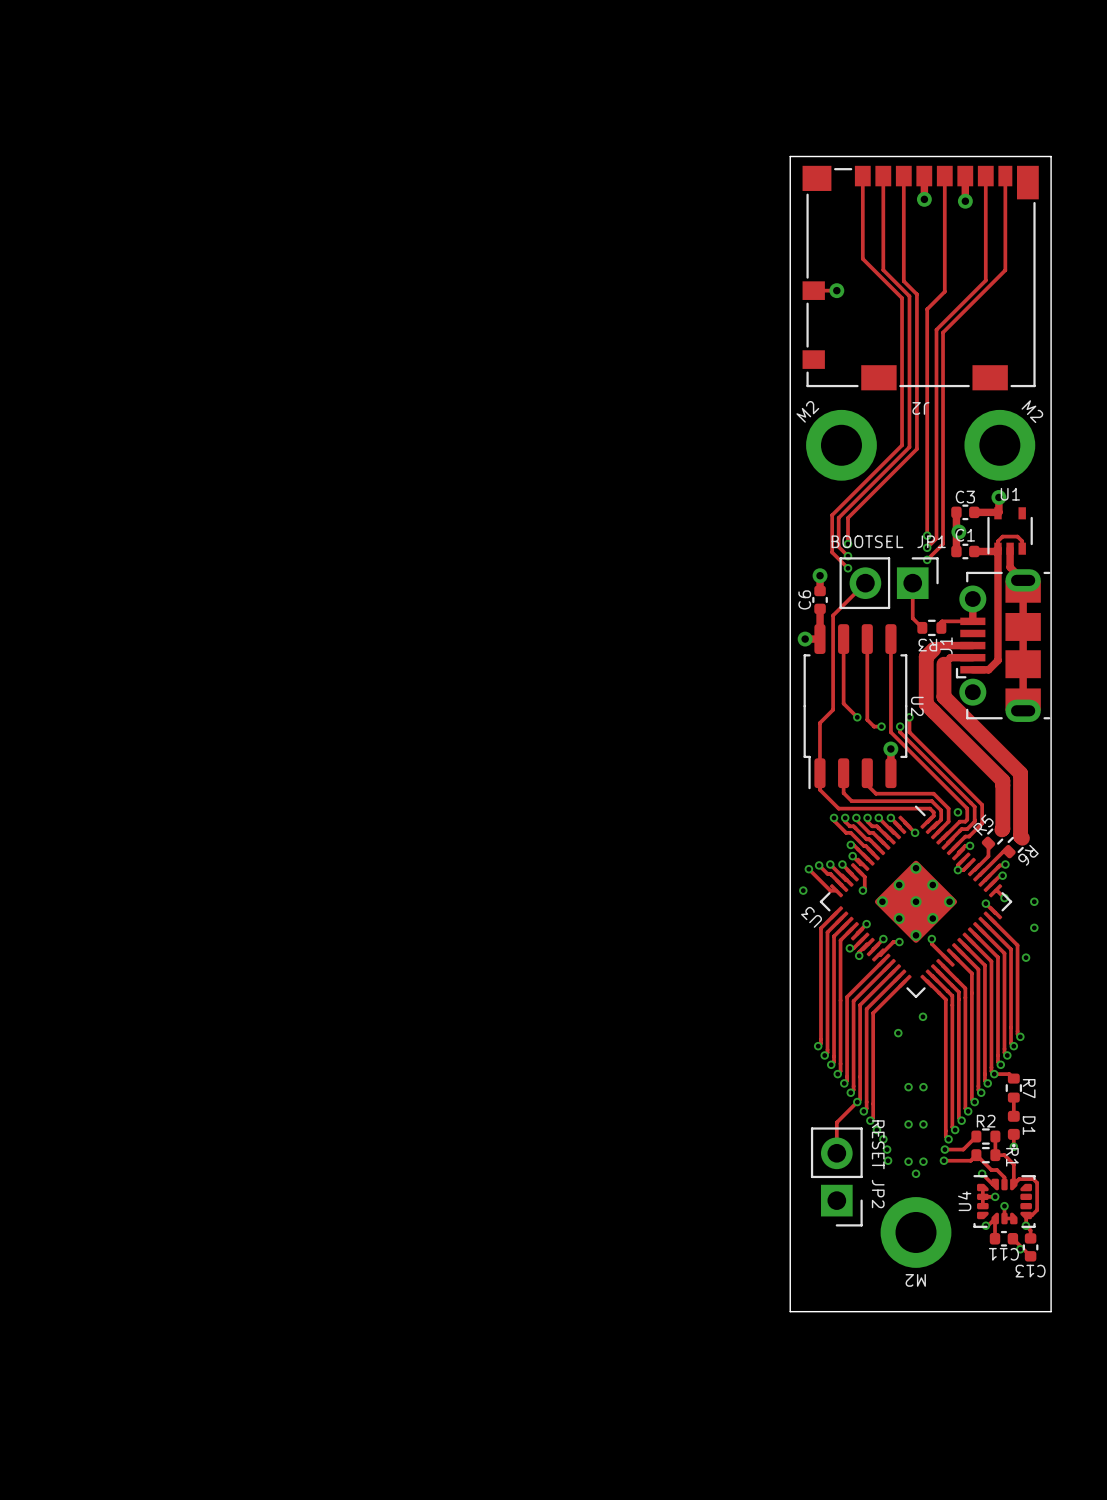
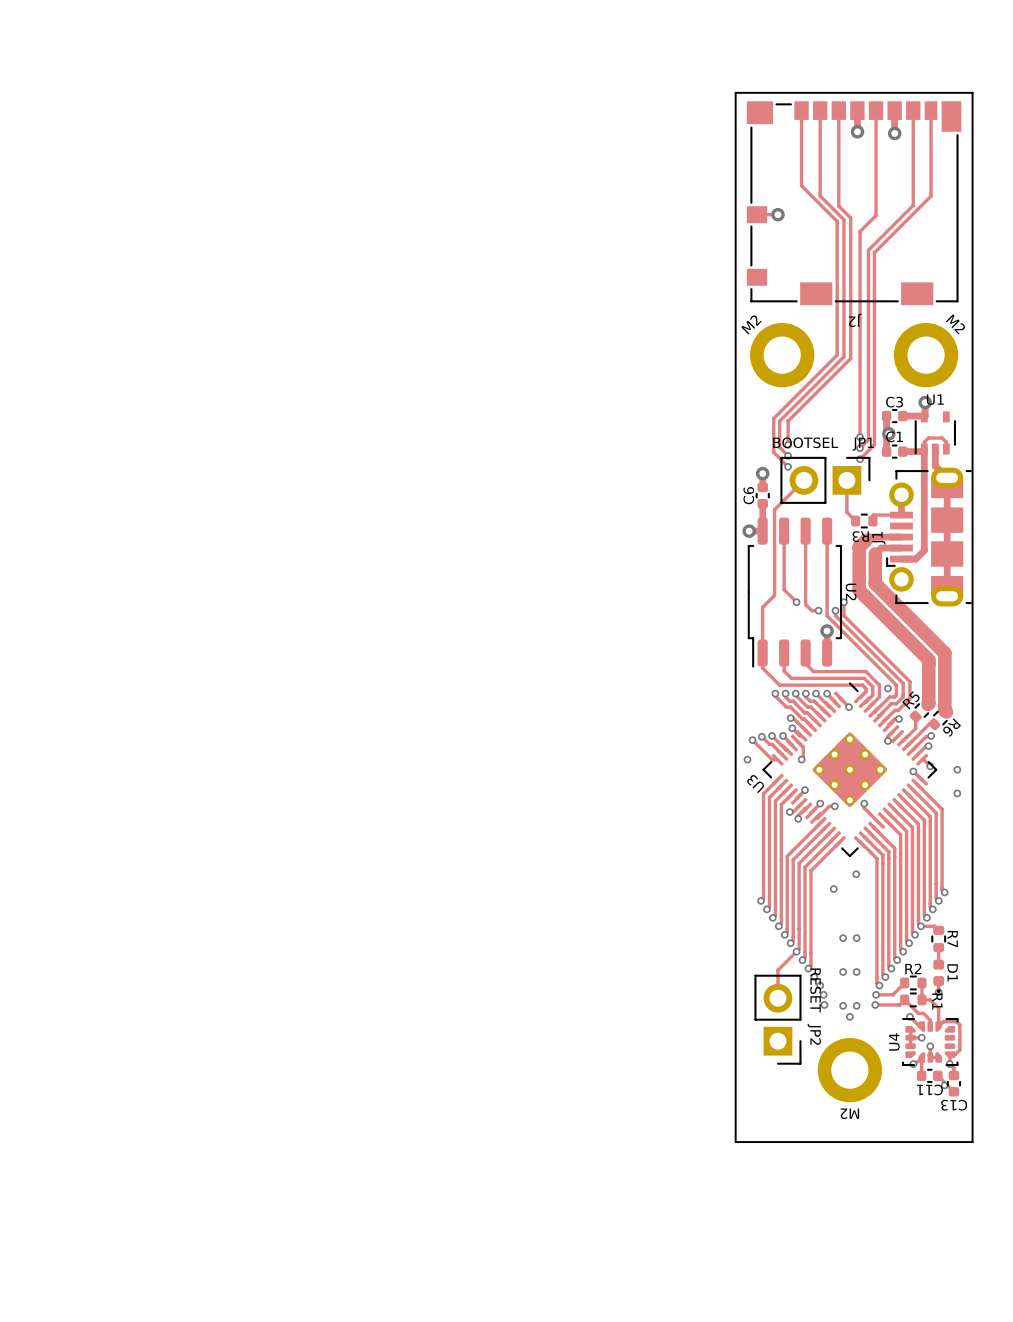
via: (1026, 957) -> none

